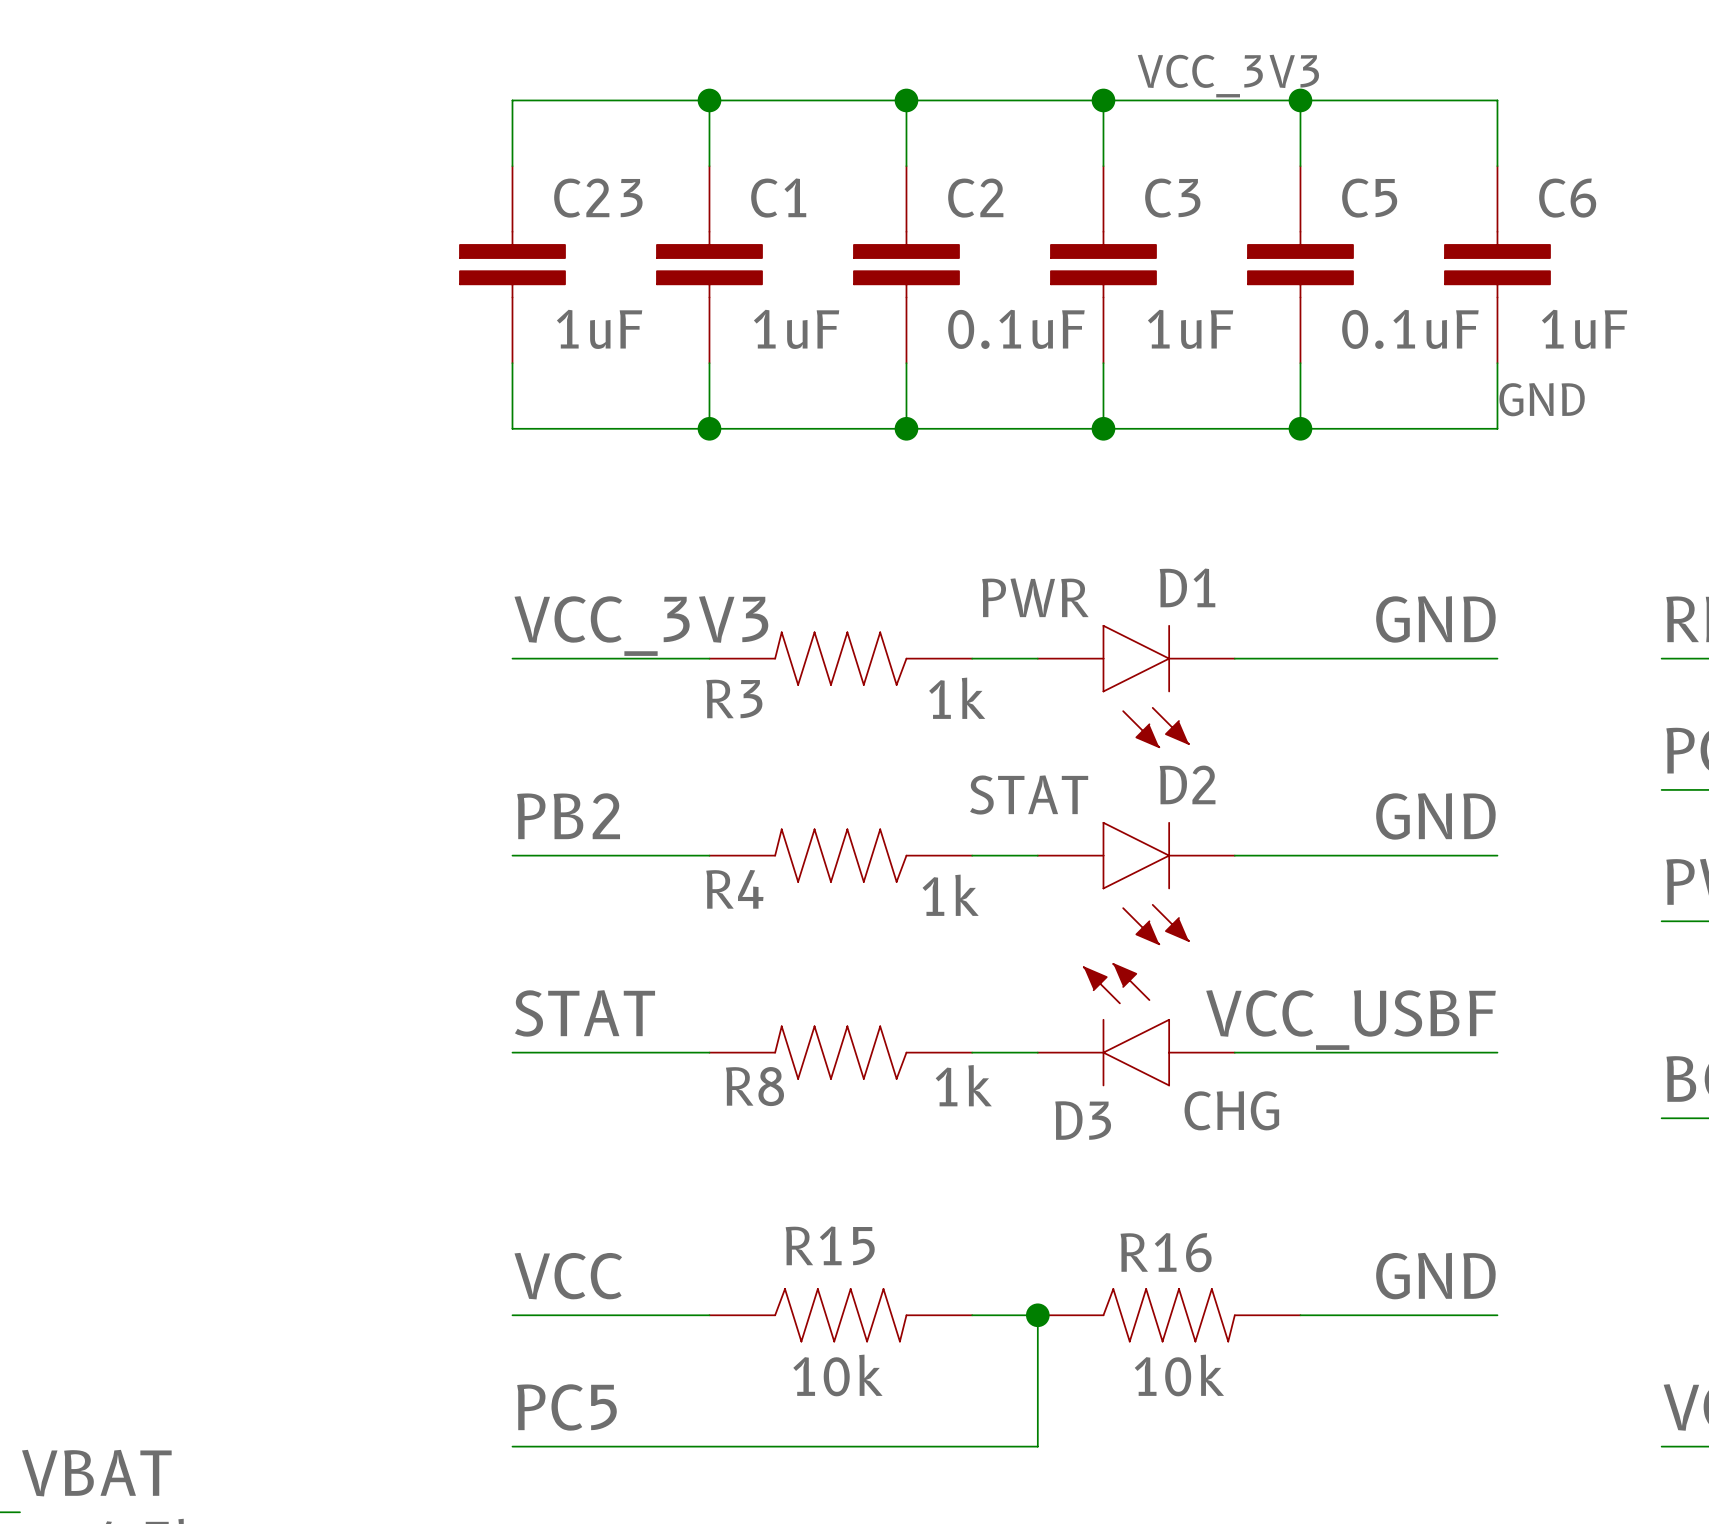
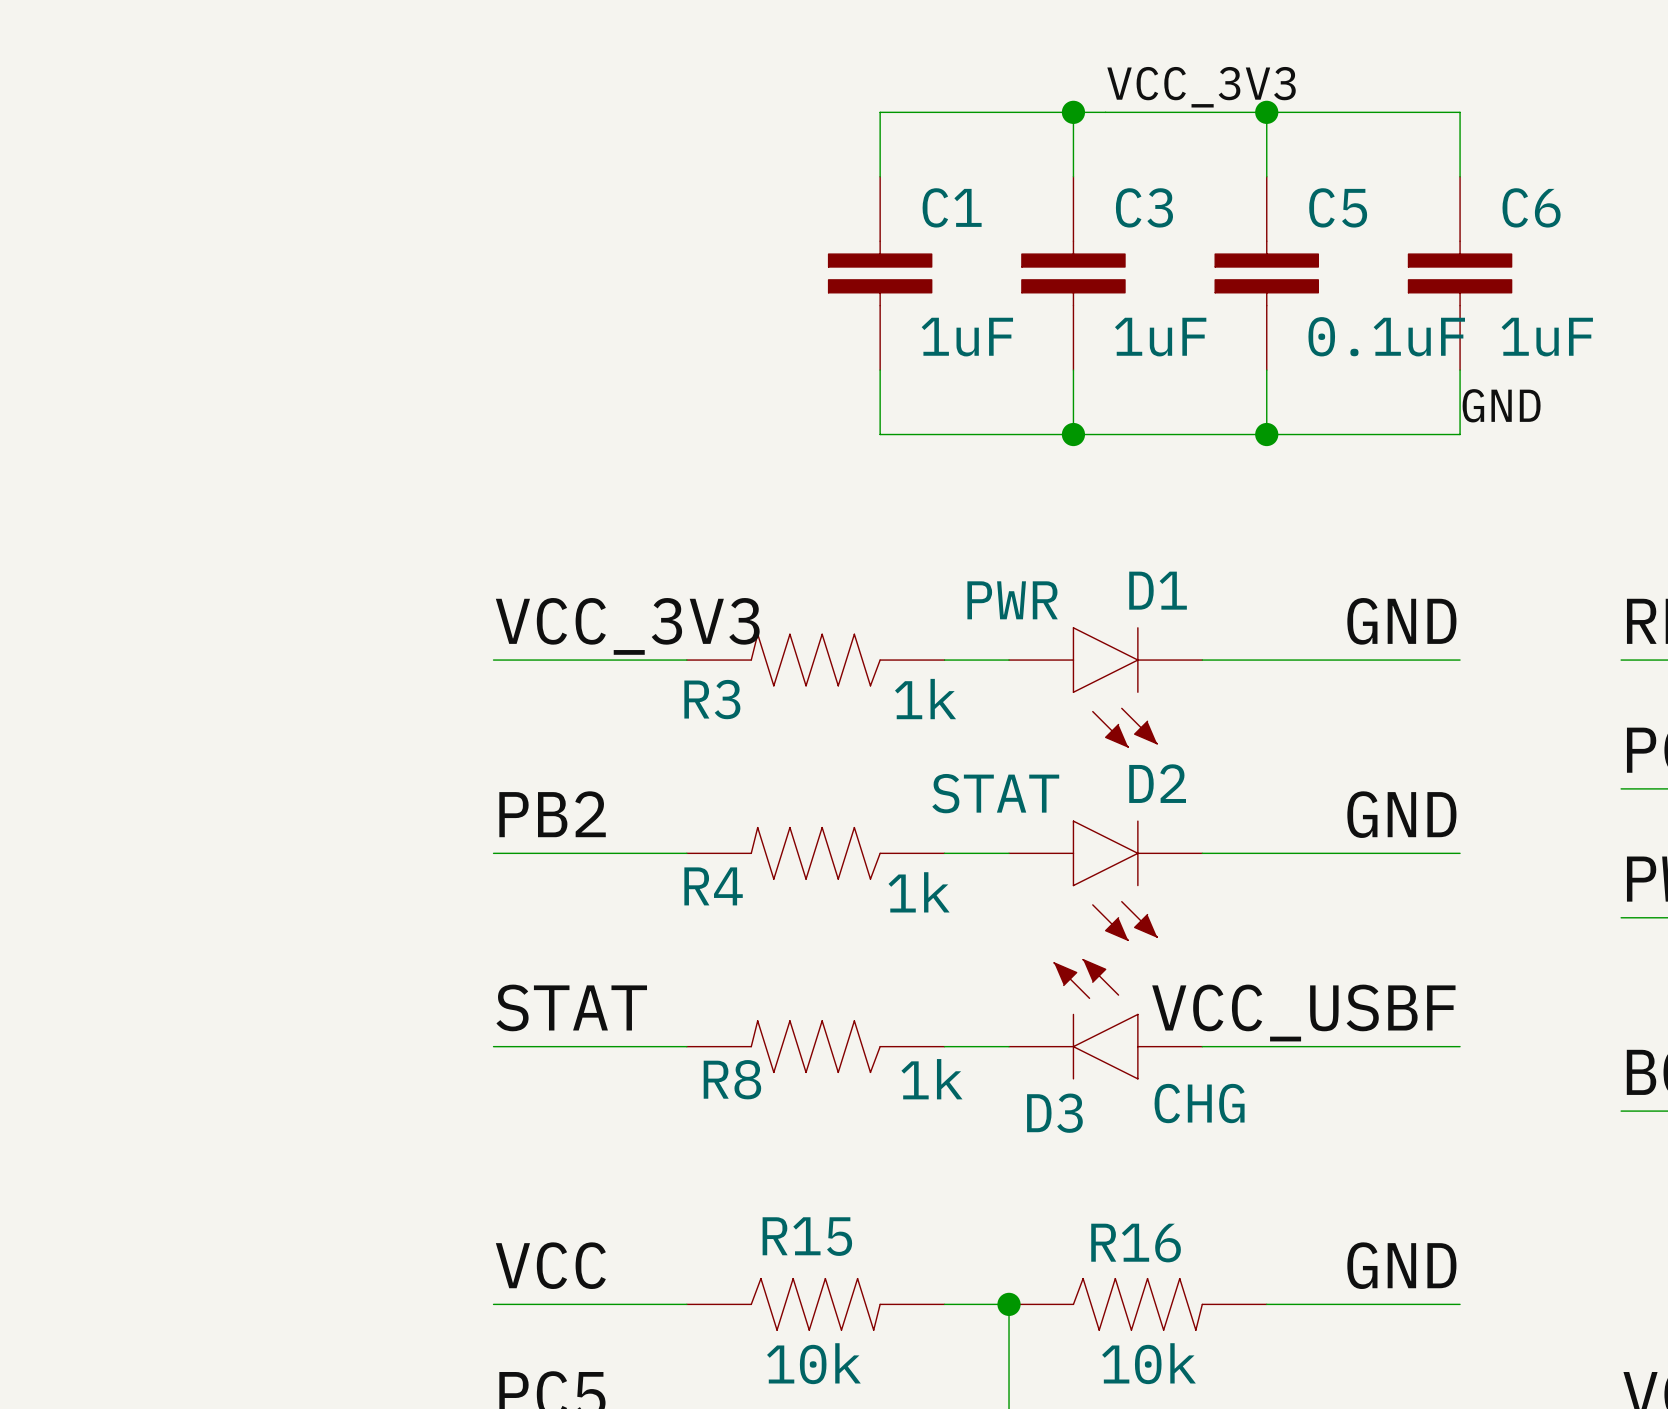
wire: (709, 100) (709, 166) -> none
junction: (709, 100) -> none
wire: (906, 100) (512, 100) (512, 166) -> none
junction: (906, 100) -> none
C2 name: C2 (975, 198) -> C1 (952, 207)
C23: 1uF (512, 264) -> none
C1: 1uF (709, 264) -> none
C2 value: 0.1uF (1016, 329) -> 1uF (967, 337)
wire: (512, 363) (512, 428) (906, 428) -> none
wire: (709, 363) (709, 428) -> none
junction: (709, 428) -> none
junction: (906, 428) -> none

